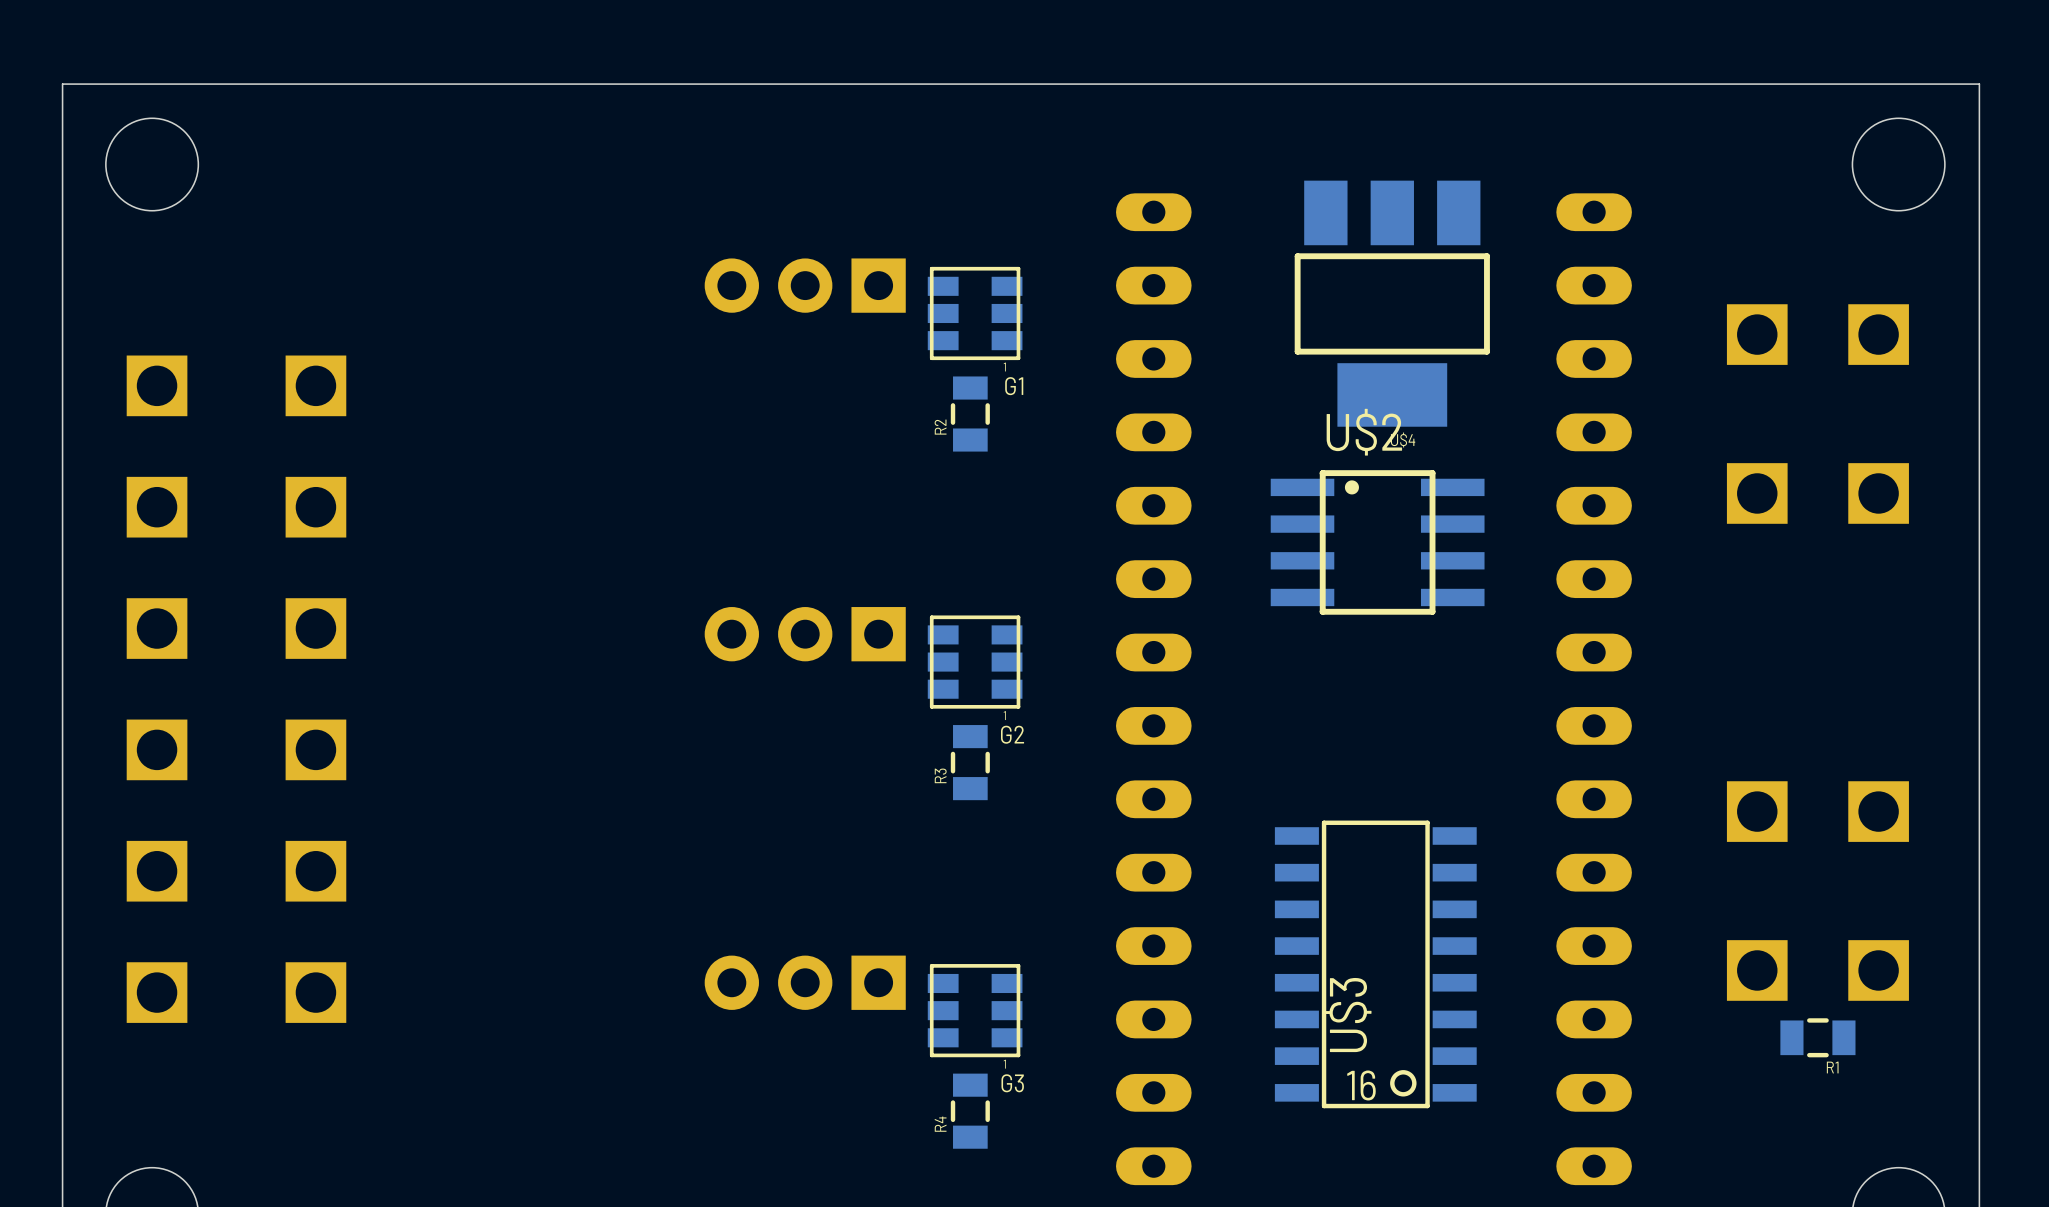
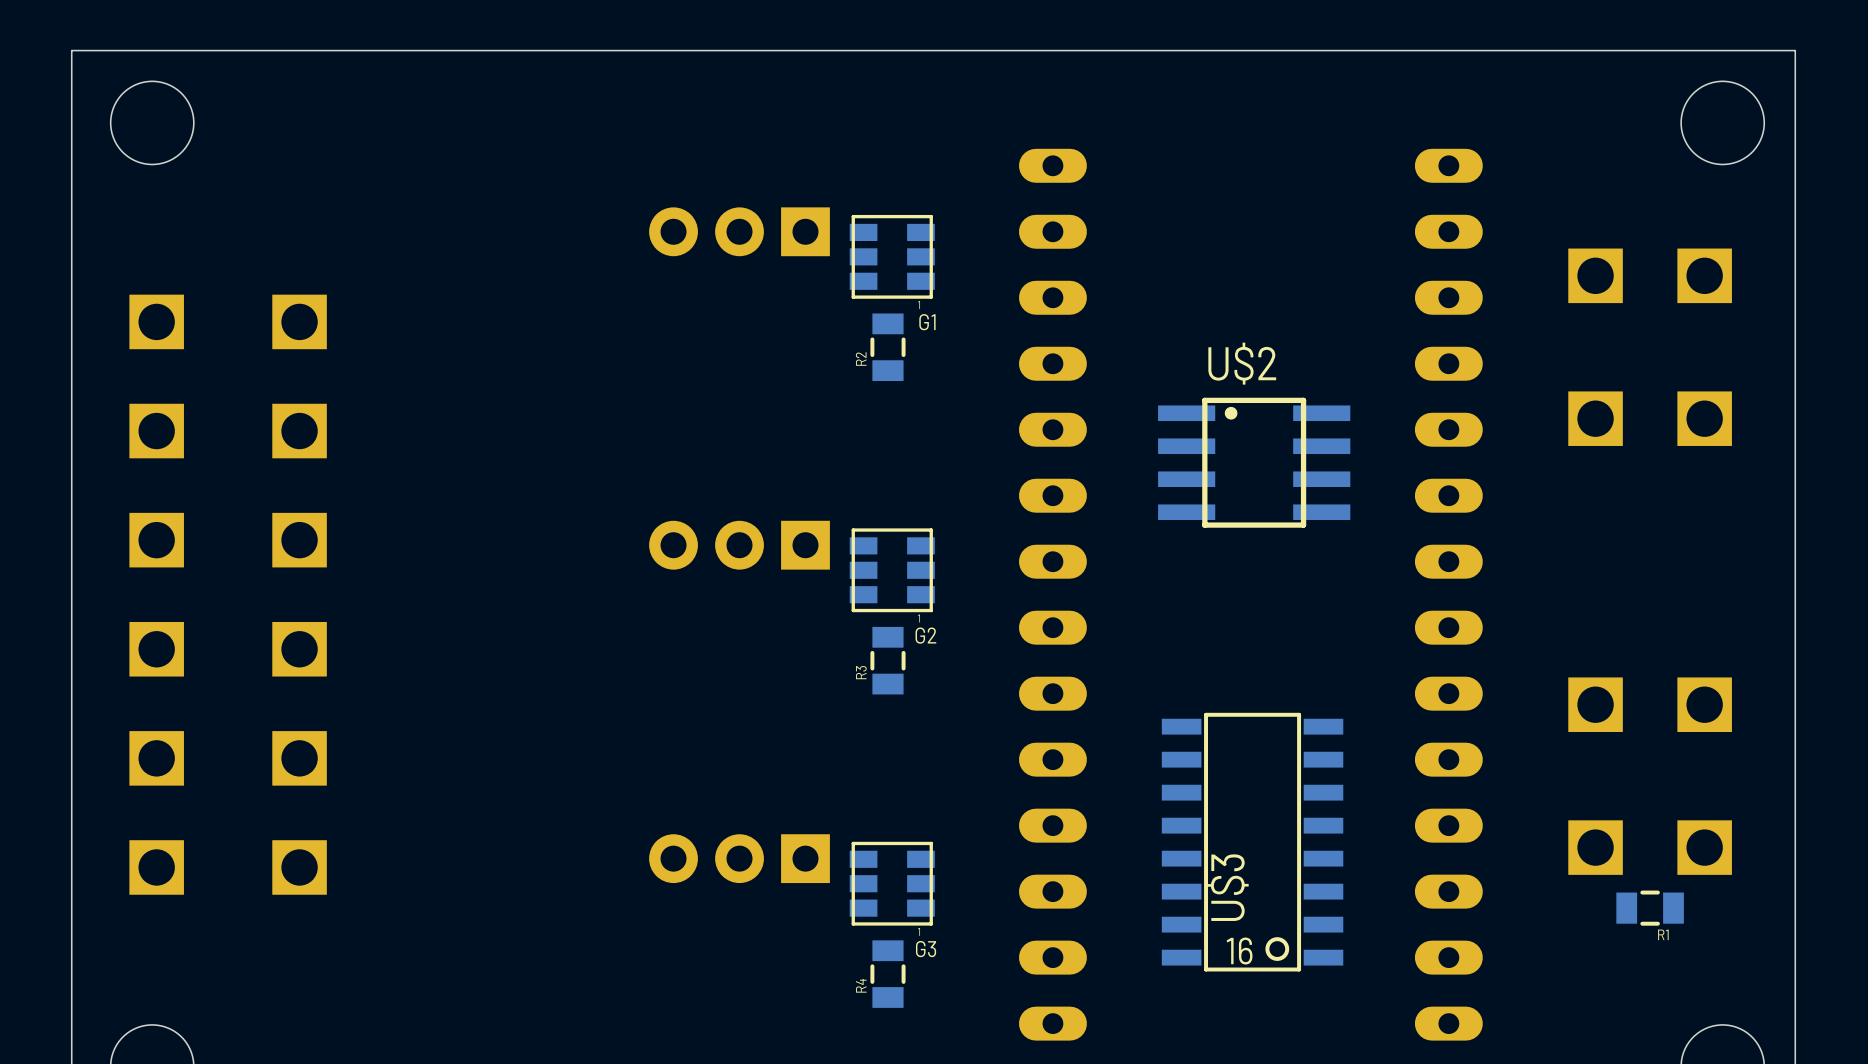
U$4: (1392, 303) -> none

